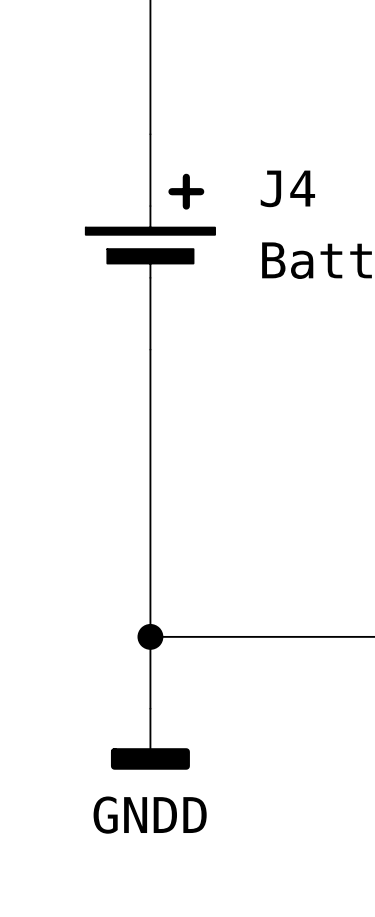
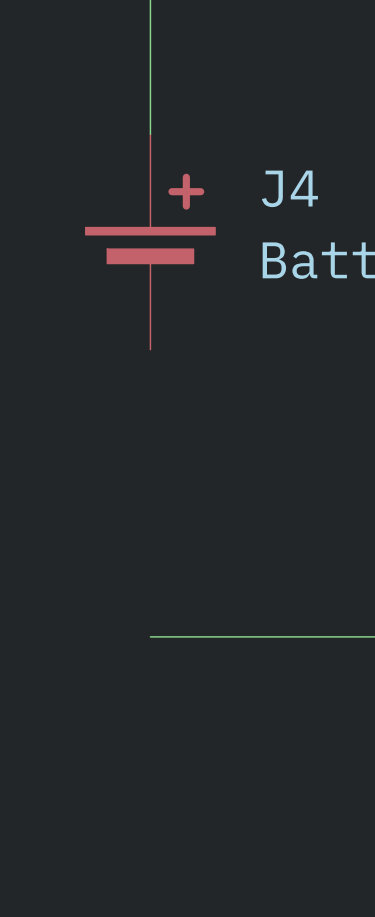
wire: (150, 349) (150, 708) -> none
junction: (150, 636) -> none
power symbol: GNDD (150, 739) -> none

